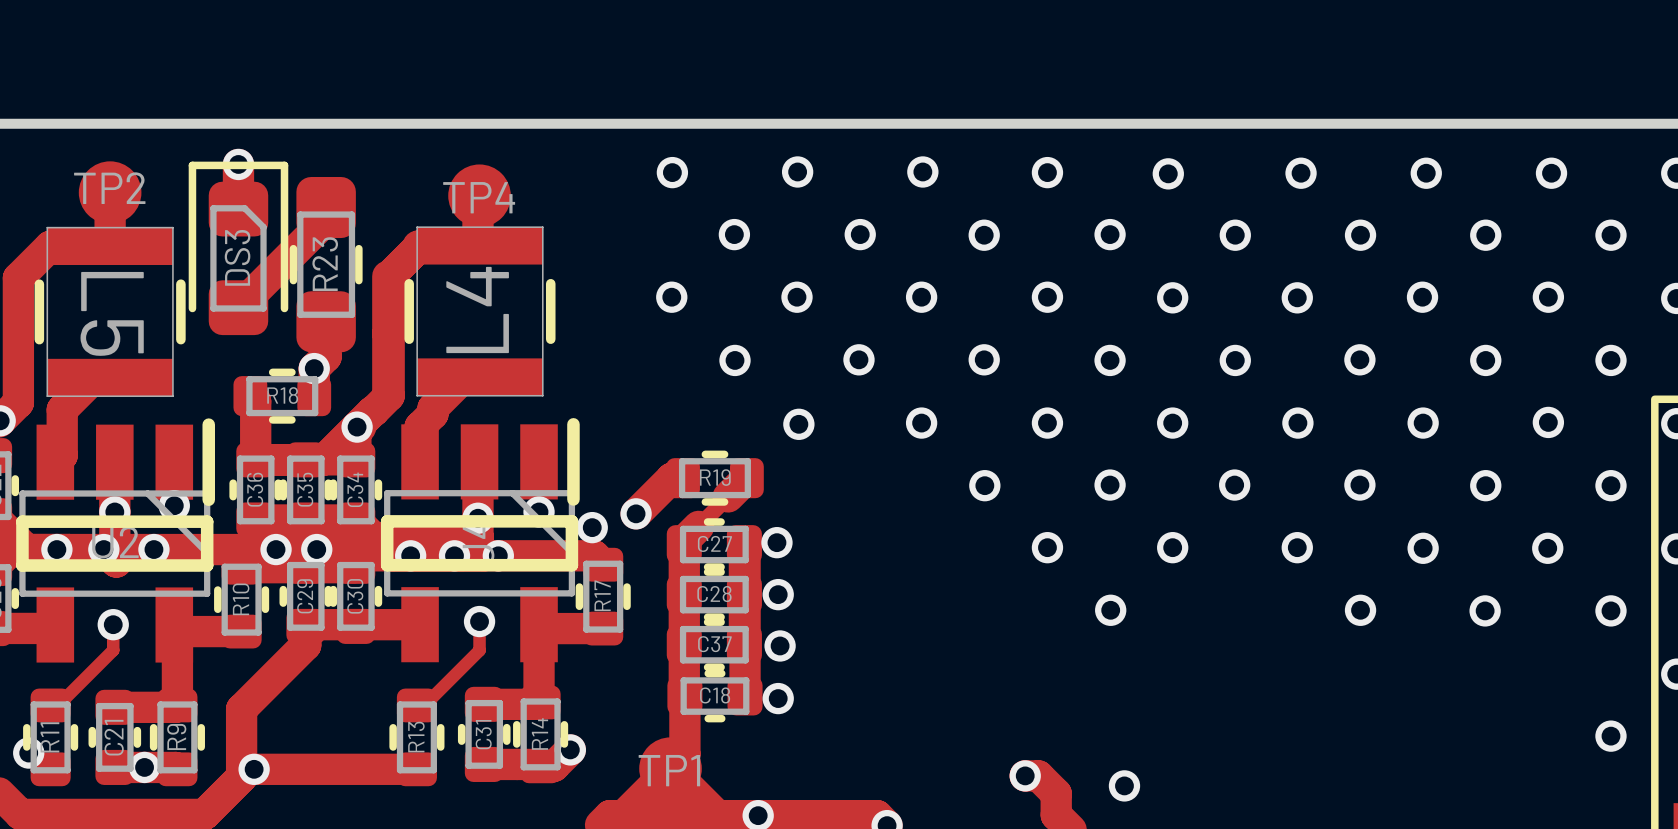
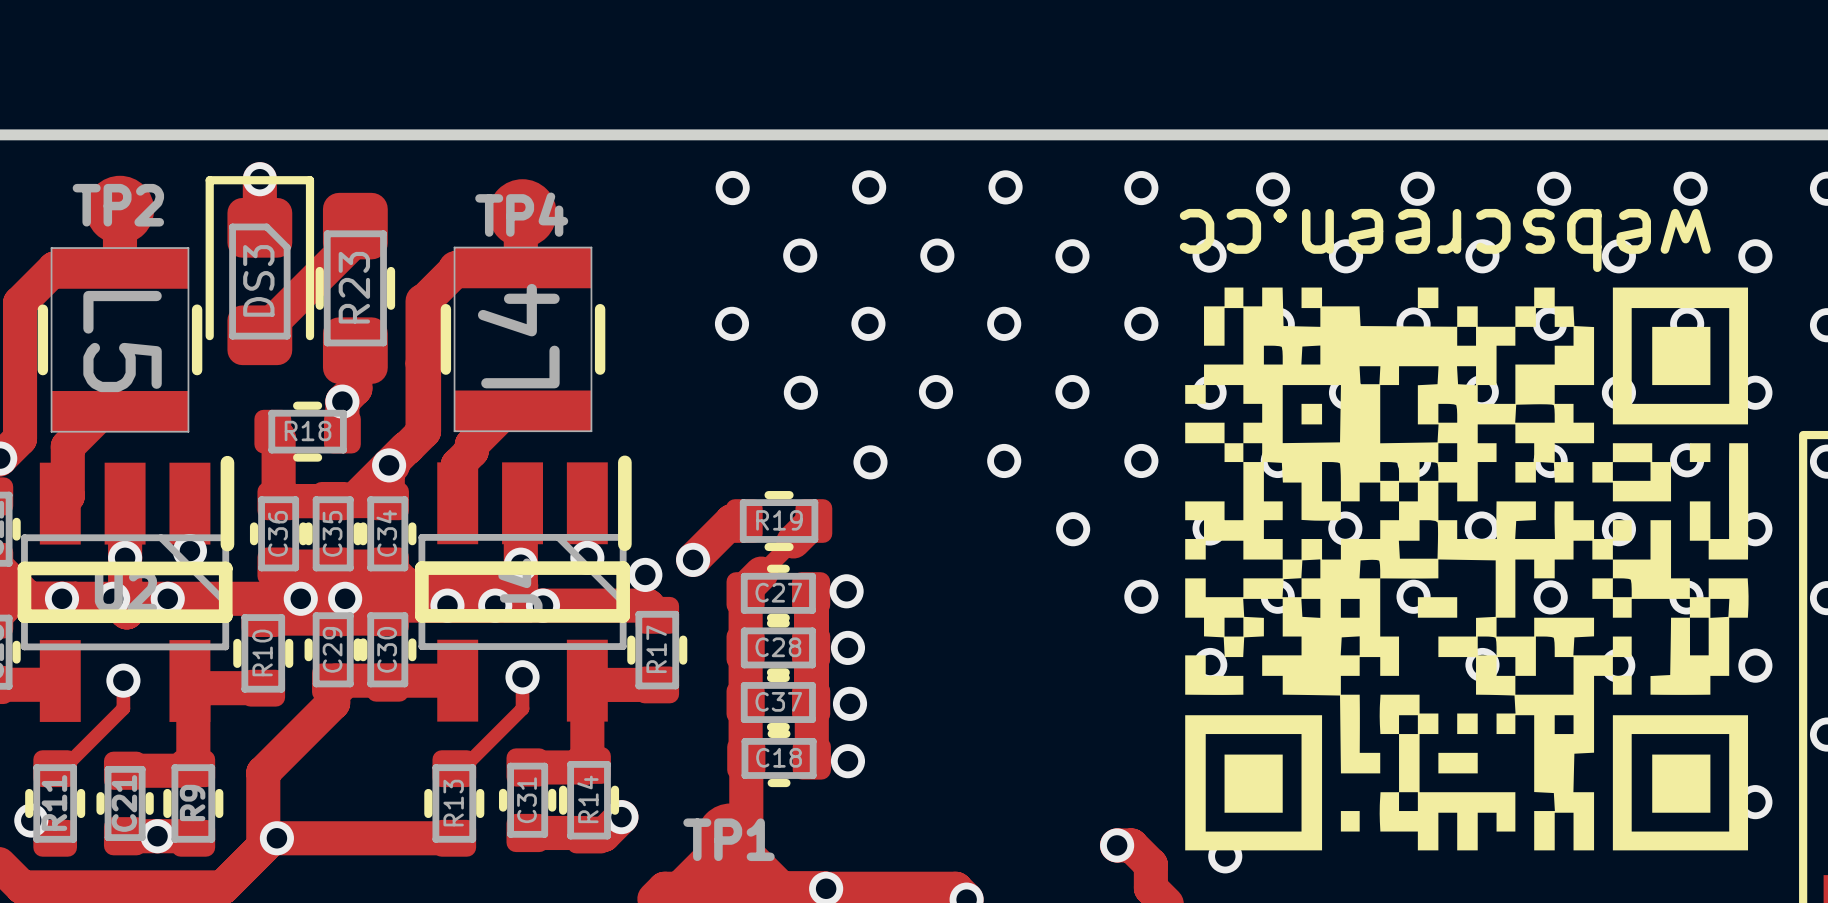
text: none -> webscreen.cc (1445, 240)
drawing: none -> [1185, 287, 1749, 851]

